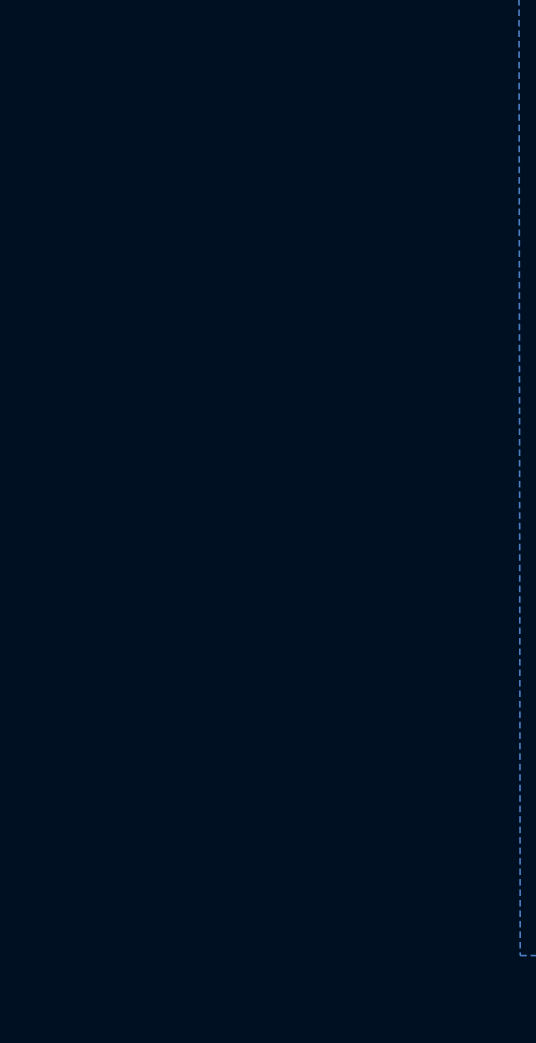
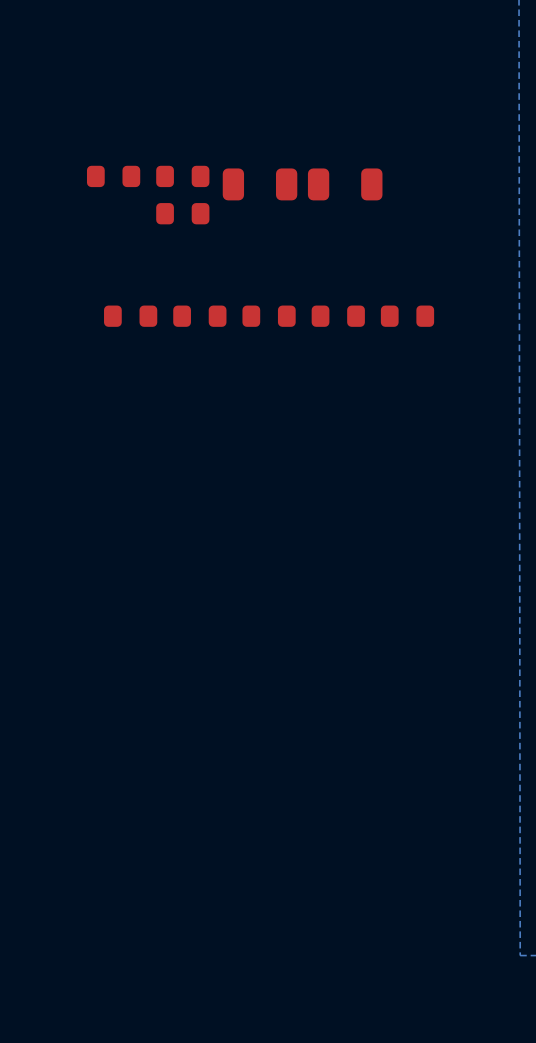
part: none -> (113, 176)
part: none -> (182, 176)
part: none -> (260, 184)
part: none -> (345, 184)
part: none -> (182, 213)
part: none -> (130, 316)
part: none -> (199, 316)
part: none -> (269, 316)
part: none -> (338, 316)
part: none -> (407, 316)

